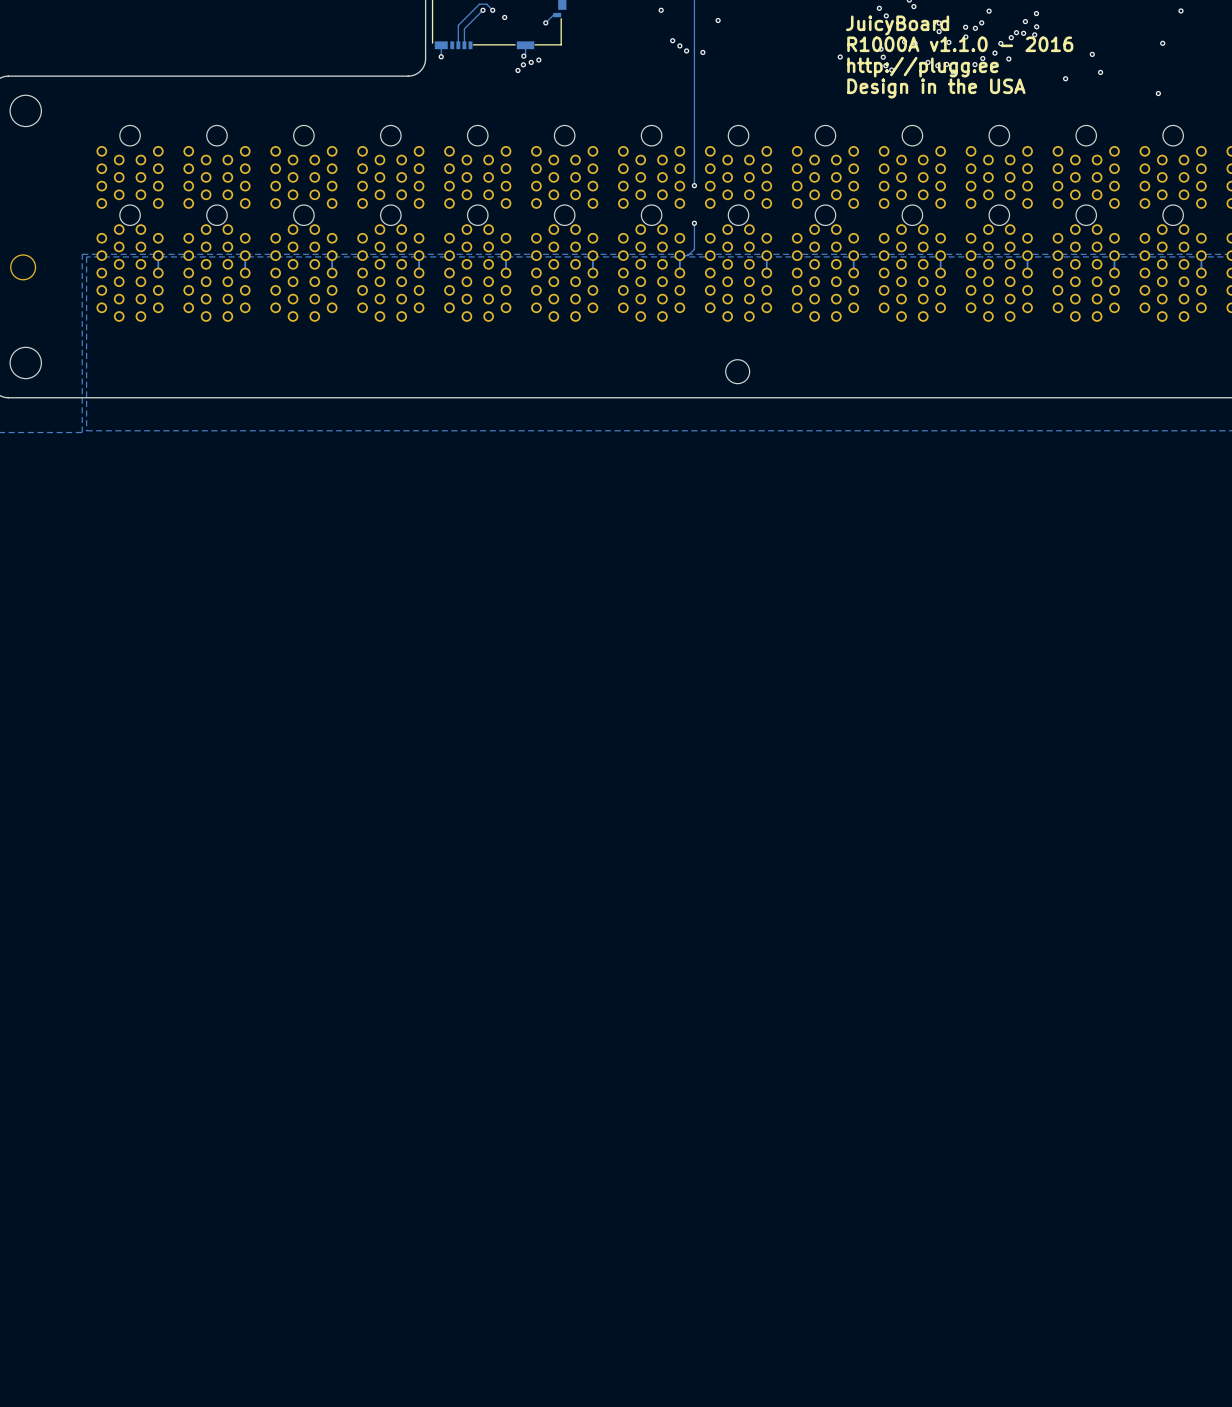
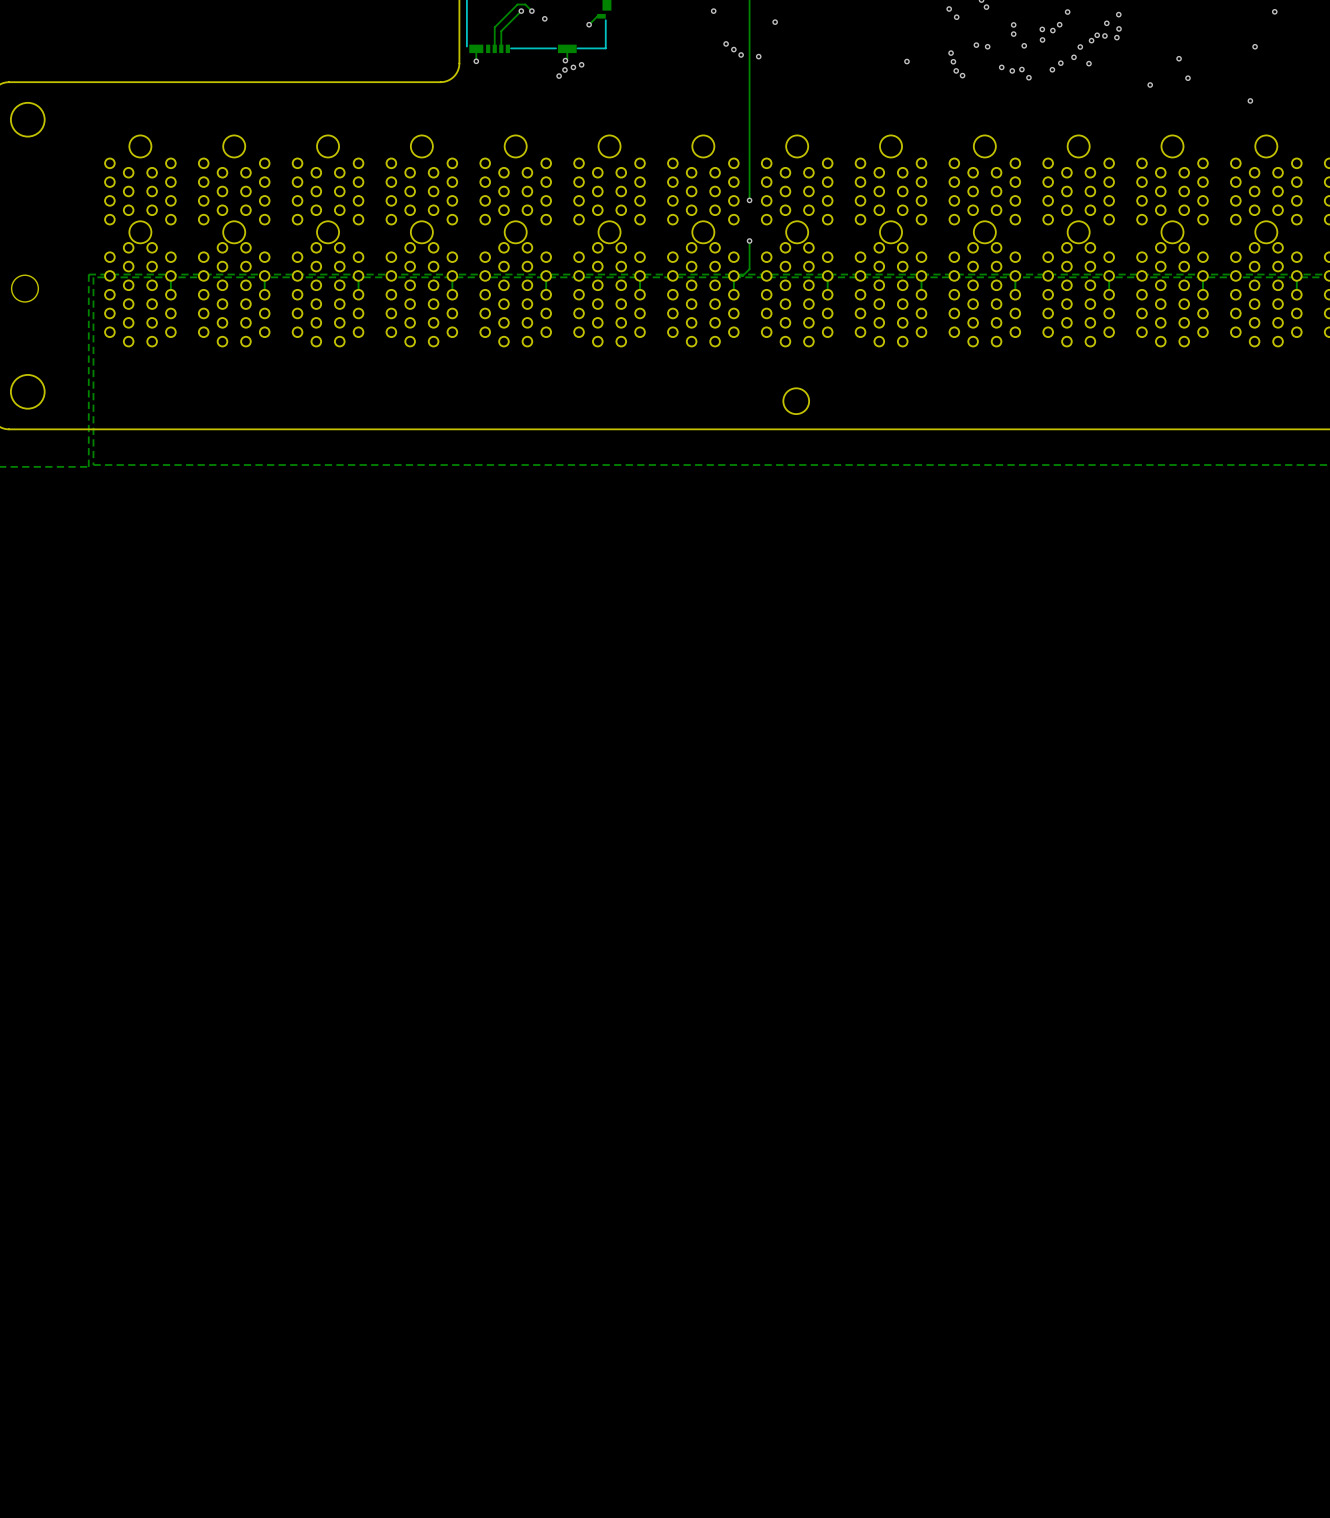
text: JuicyBoard (897, 25) -> none
text: R1000A v1.1.0 - 2016 (960, 44) -> none
text: http://plugg.ee (923, 67) -> none
text: Design in the USA (936, 88) -> none

